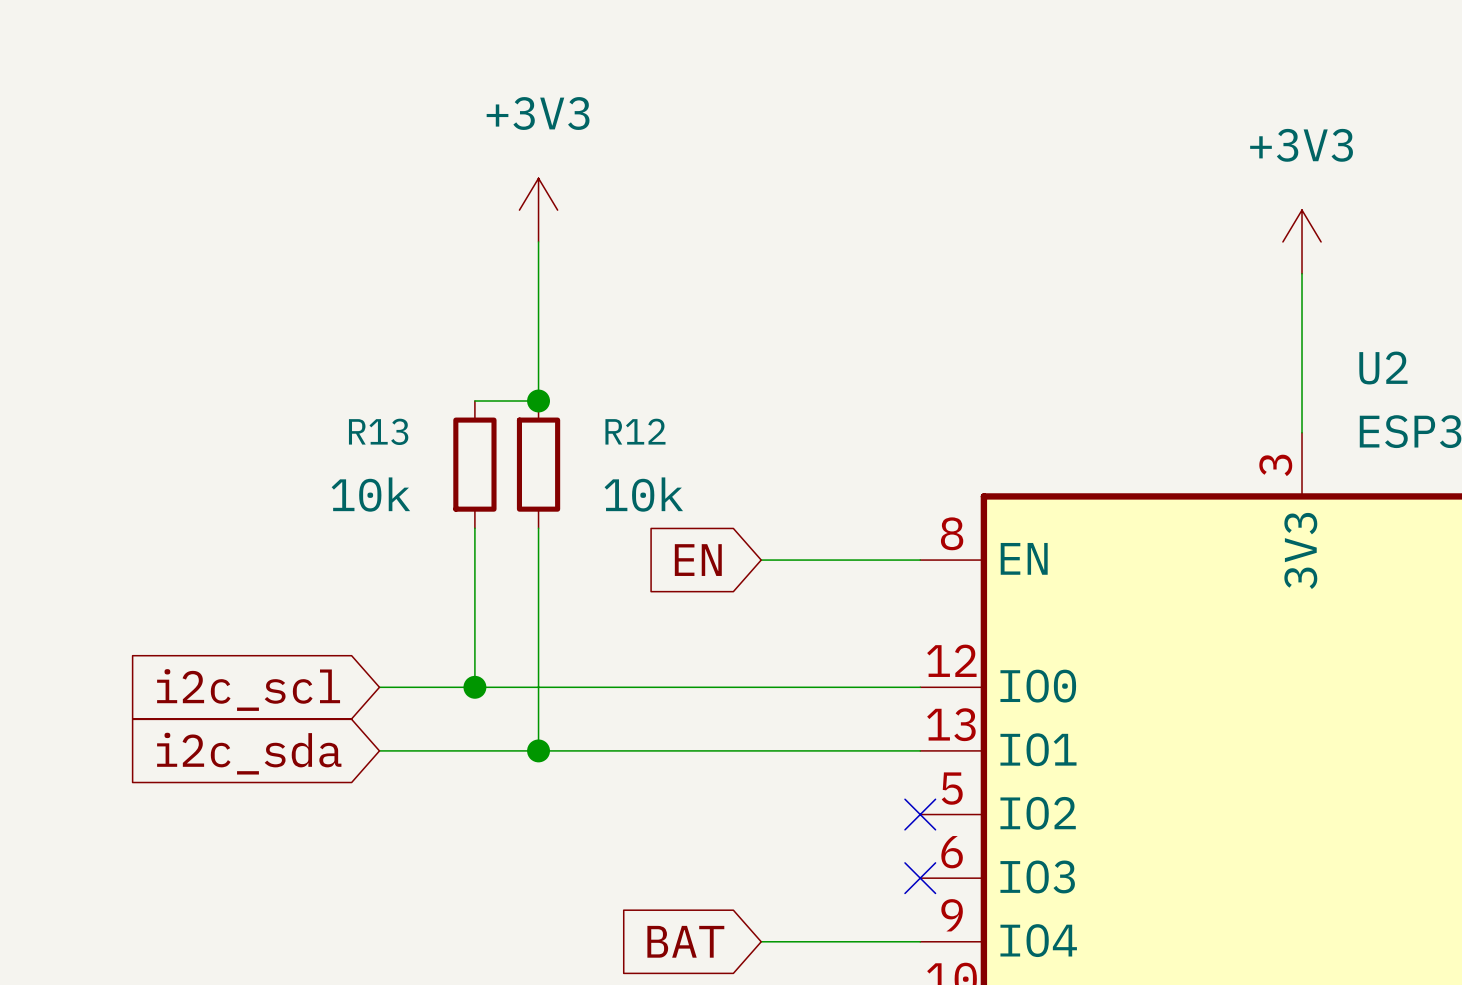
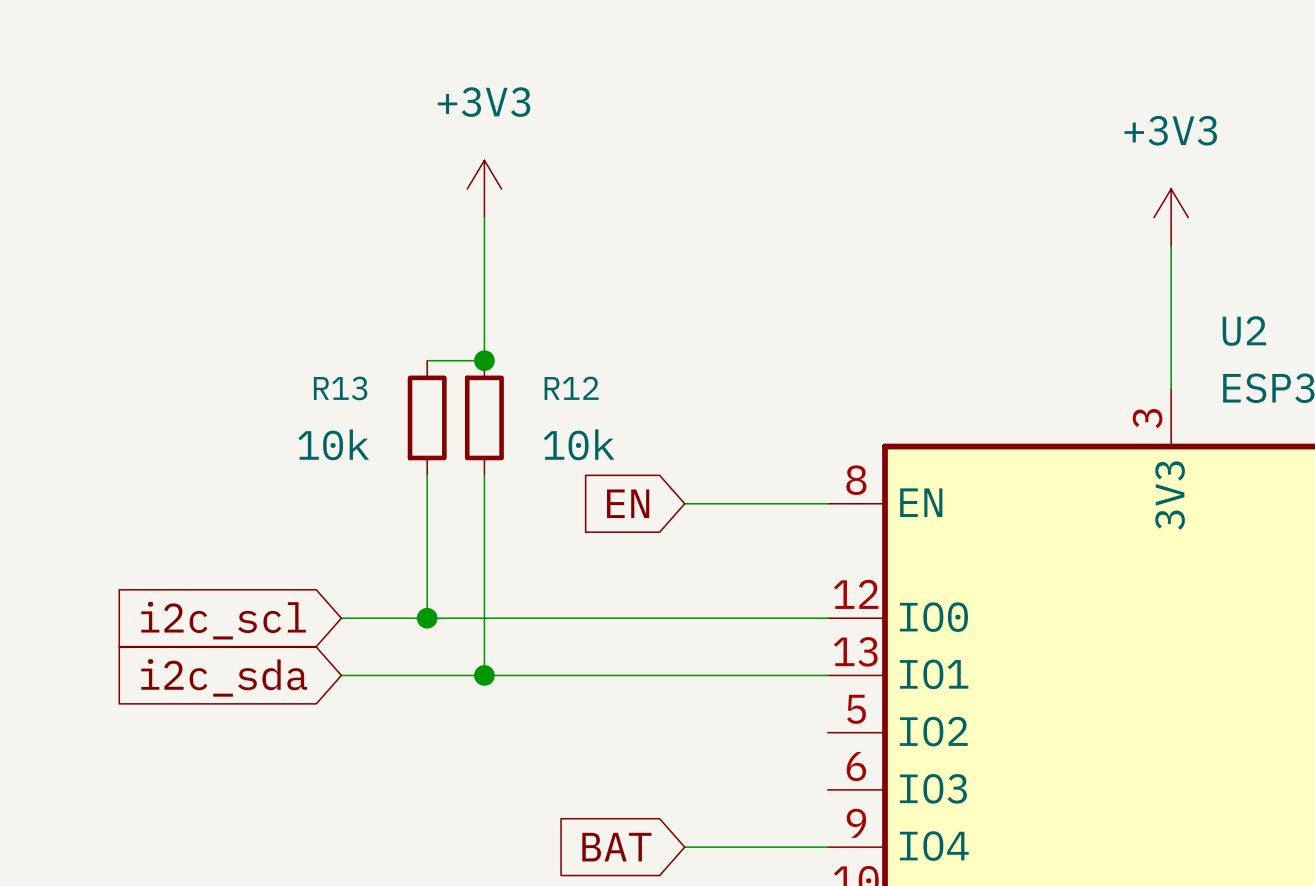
no-connect mark: (920, 814) -> none
no-connect mark: (920, 878) -> none

